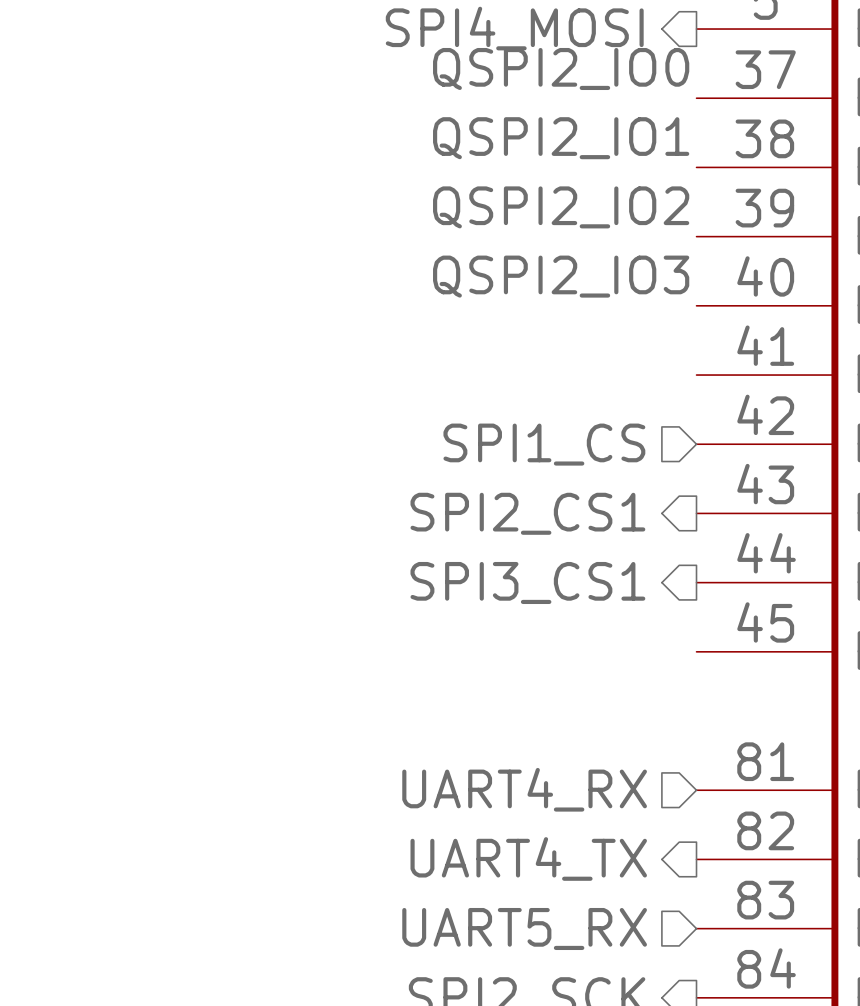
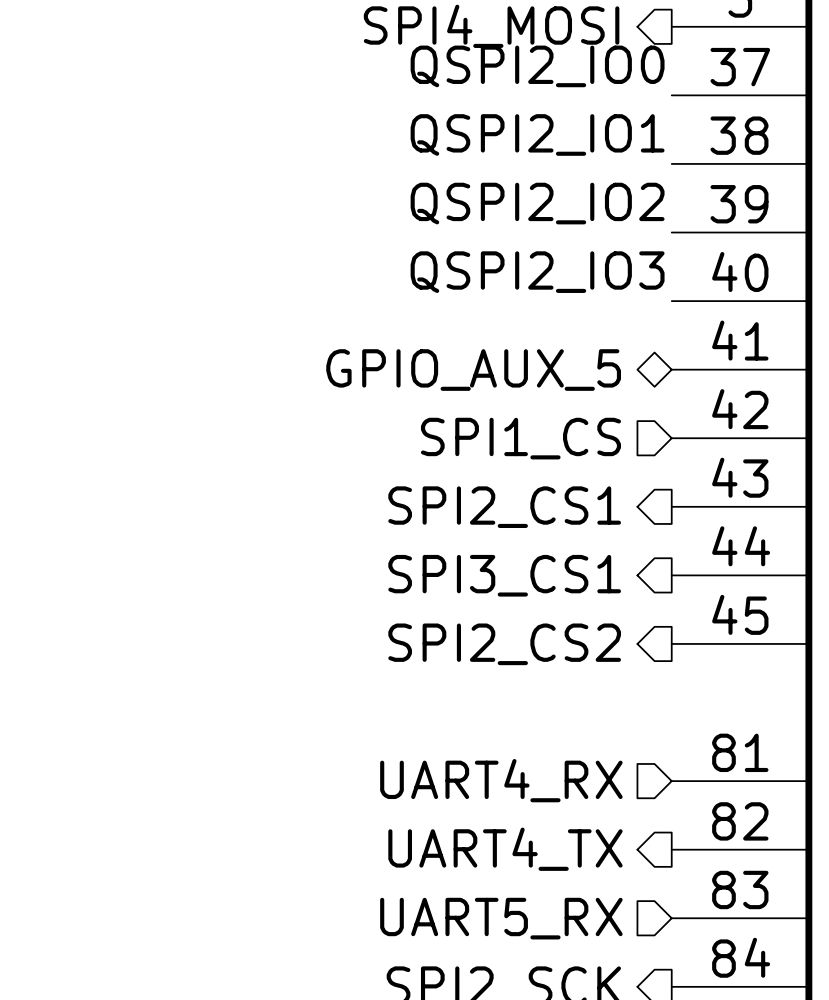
hierarchical label: none -> GPIO_AUX_5 (473, 370)
hierarchical label: none -> SPI2_CS2 (504, 644)

